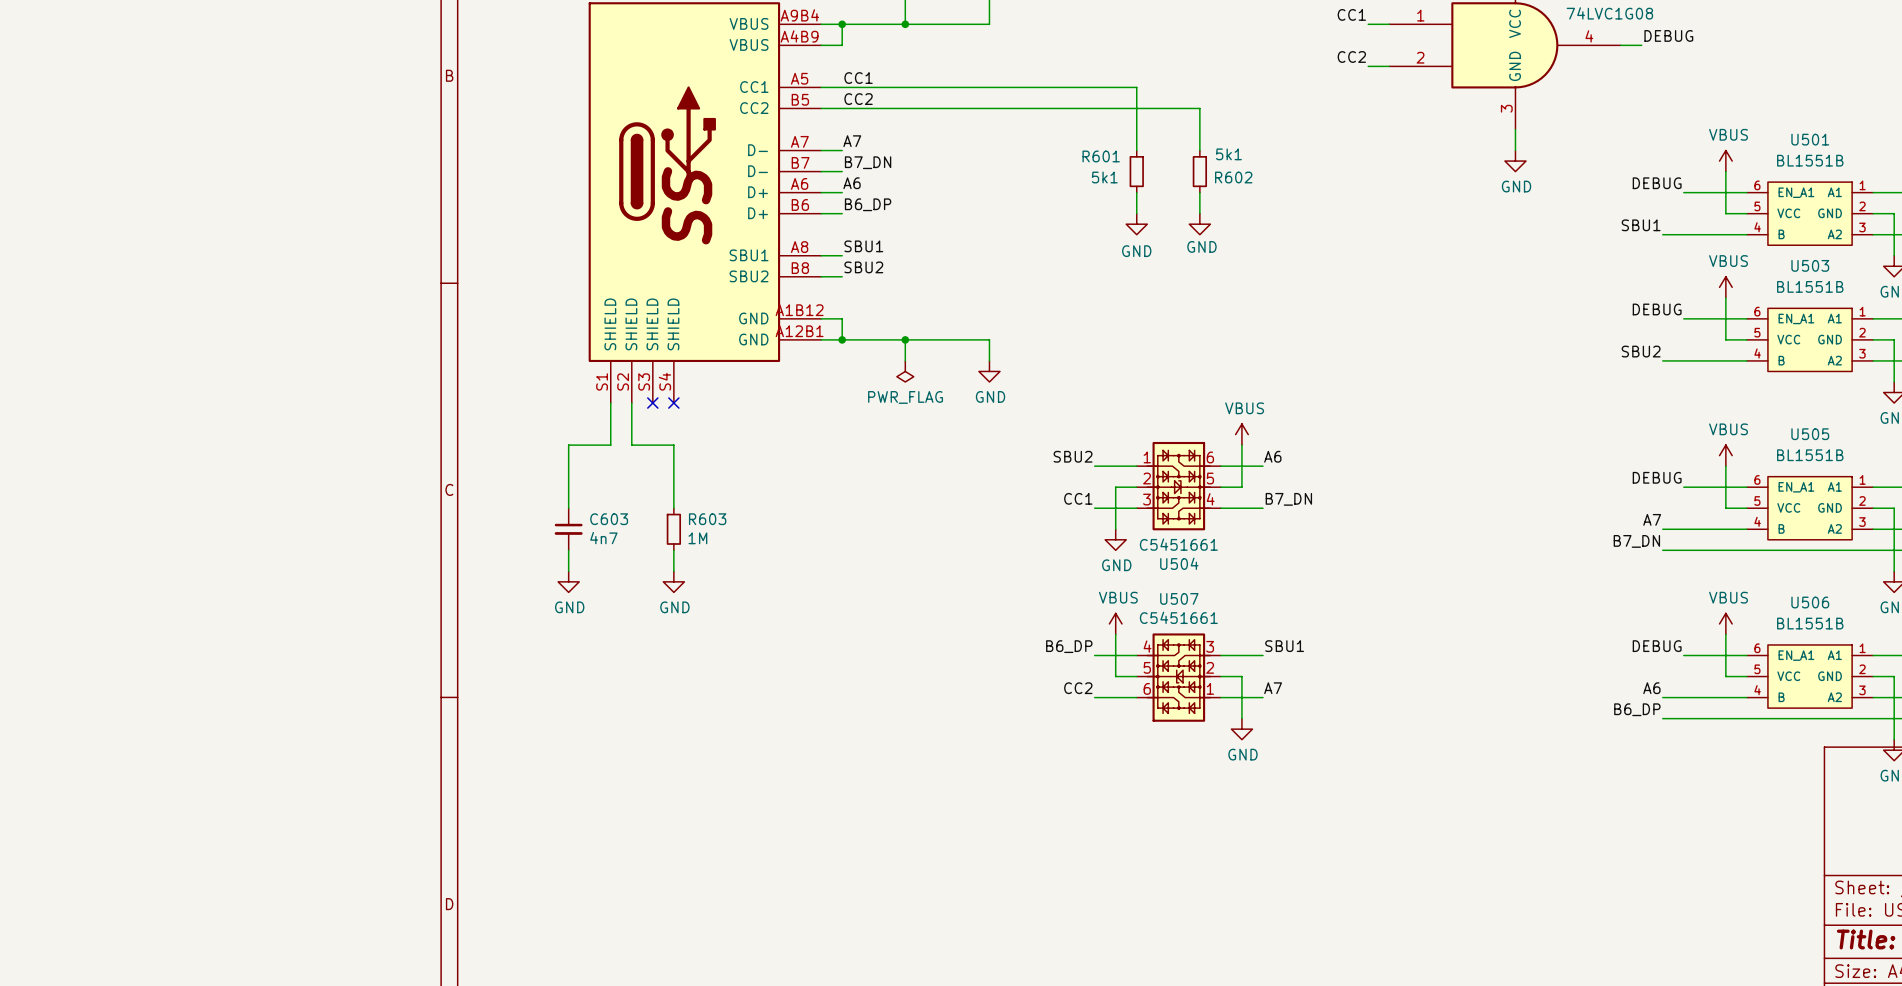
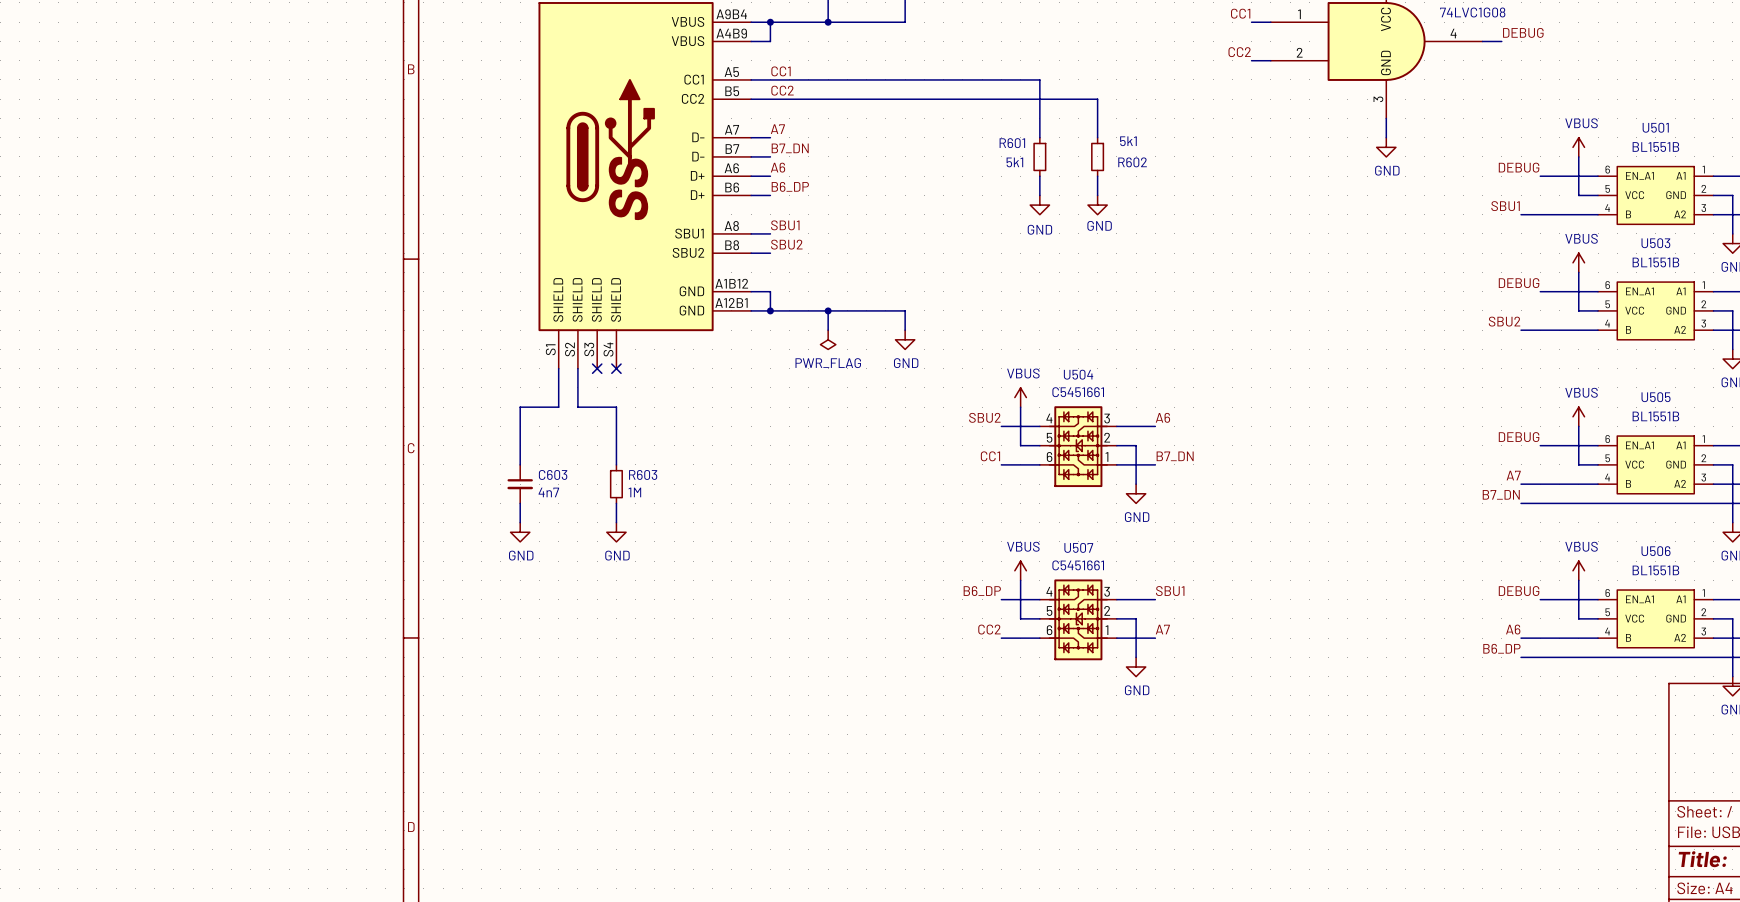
power symbol position: VBUS (1241, 434) -> VBUS (1020, 397)
wire: (1241, 445) (1241, 487) -> (1136, 484) (1136, 445)
U504 rotation: 0° (1178, 486) -> 180° (1078, 446)
wire: (1115, 487) (1115, 529) -> (1020, 445) (1020, 407)
power symbol position: GND (1115, 539) -> GND (1136, 493)

